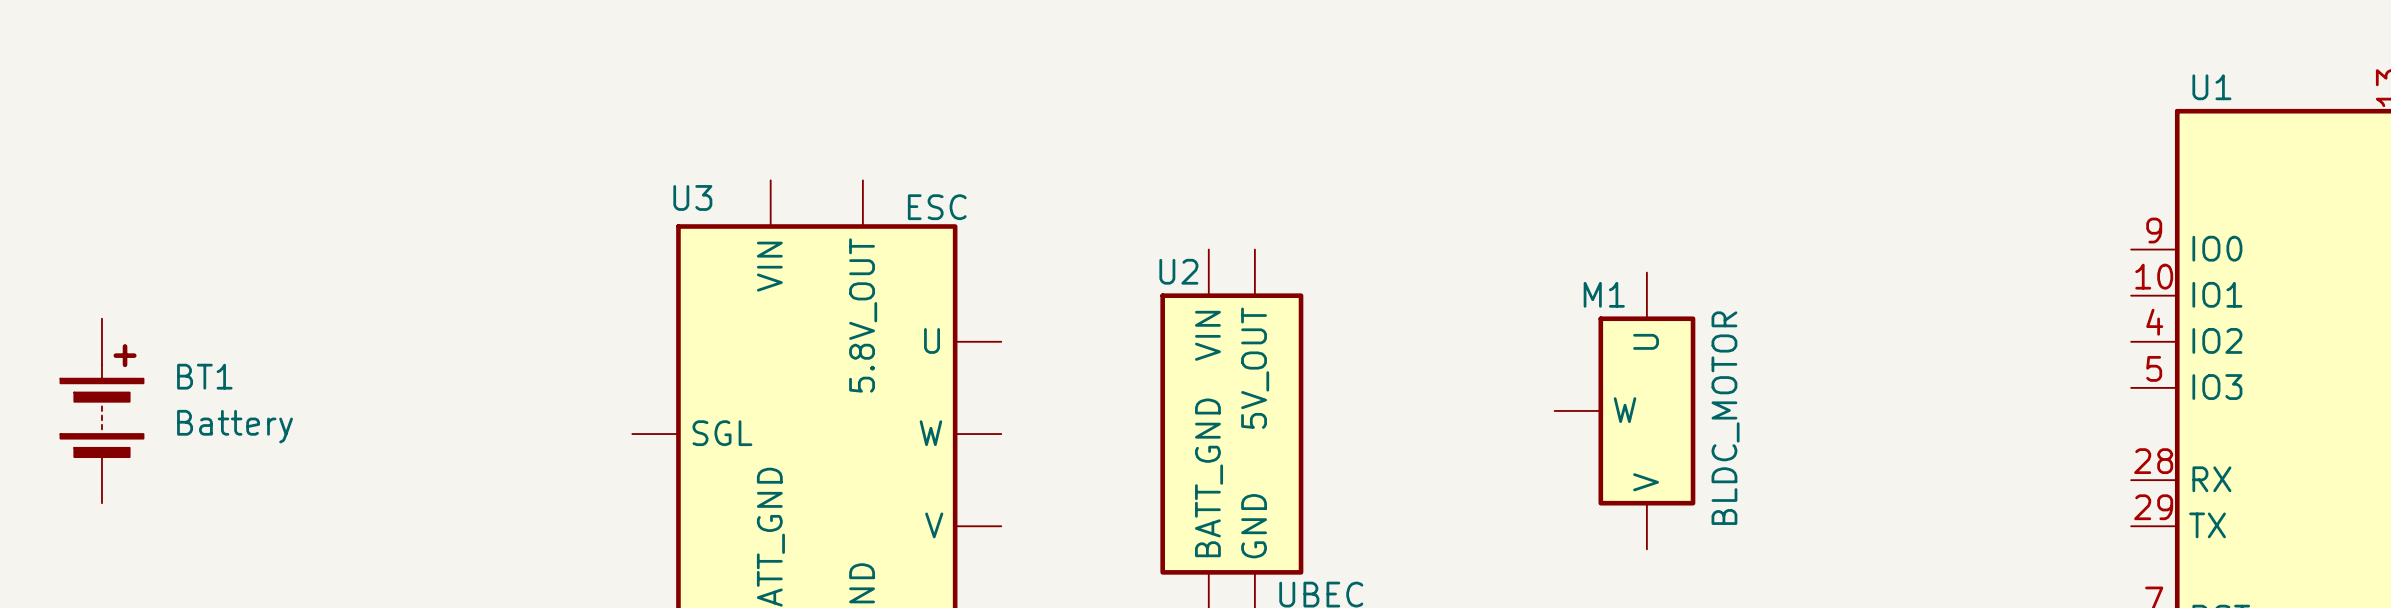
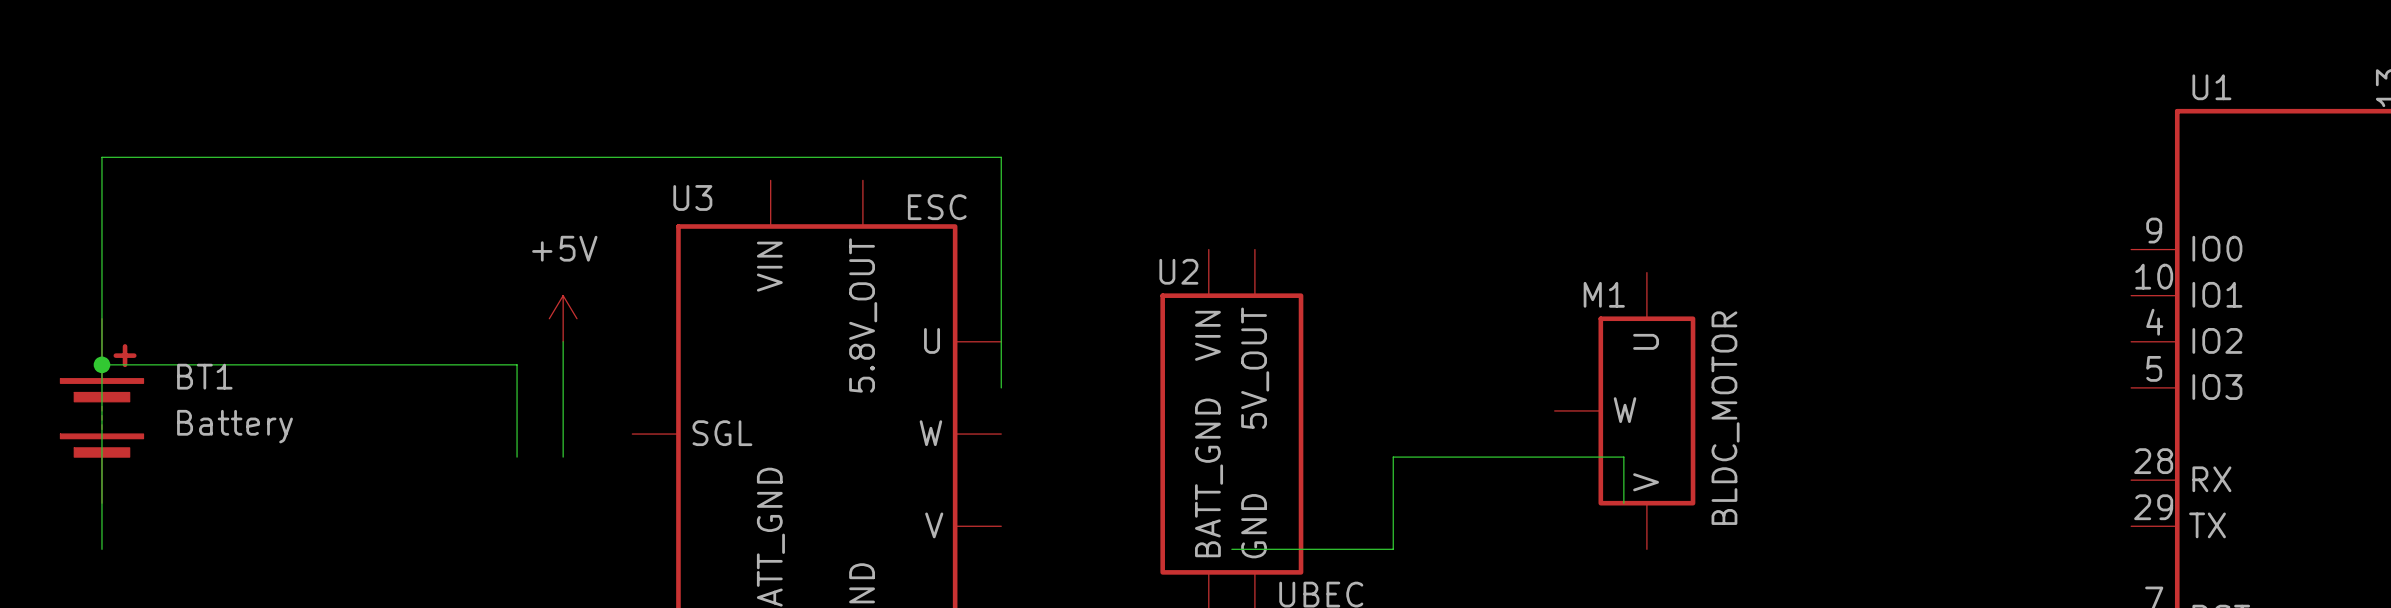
power symbol: none -> +5V (563, 318)
wire: none -> (563, 341) (563, 457)
wire: none -> (101, 364) (517, 364) (517, 457)
junction: none -> (101, 364)
wire: none -> (1001, 387) (1001, 157) (101, 157) (101, 549)
wire: none -> (1623, 503) (1623, 457) (1393, 457) (1393, 549) (1231, 549)

